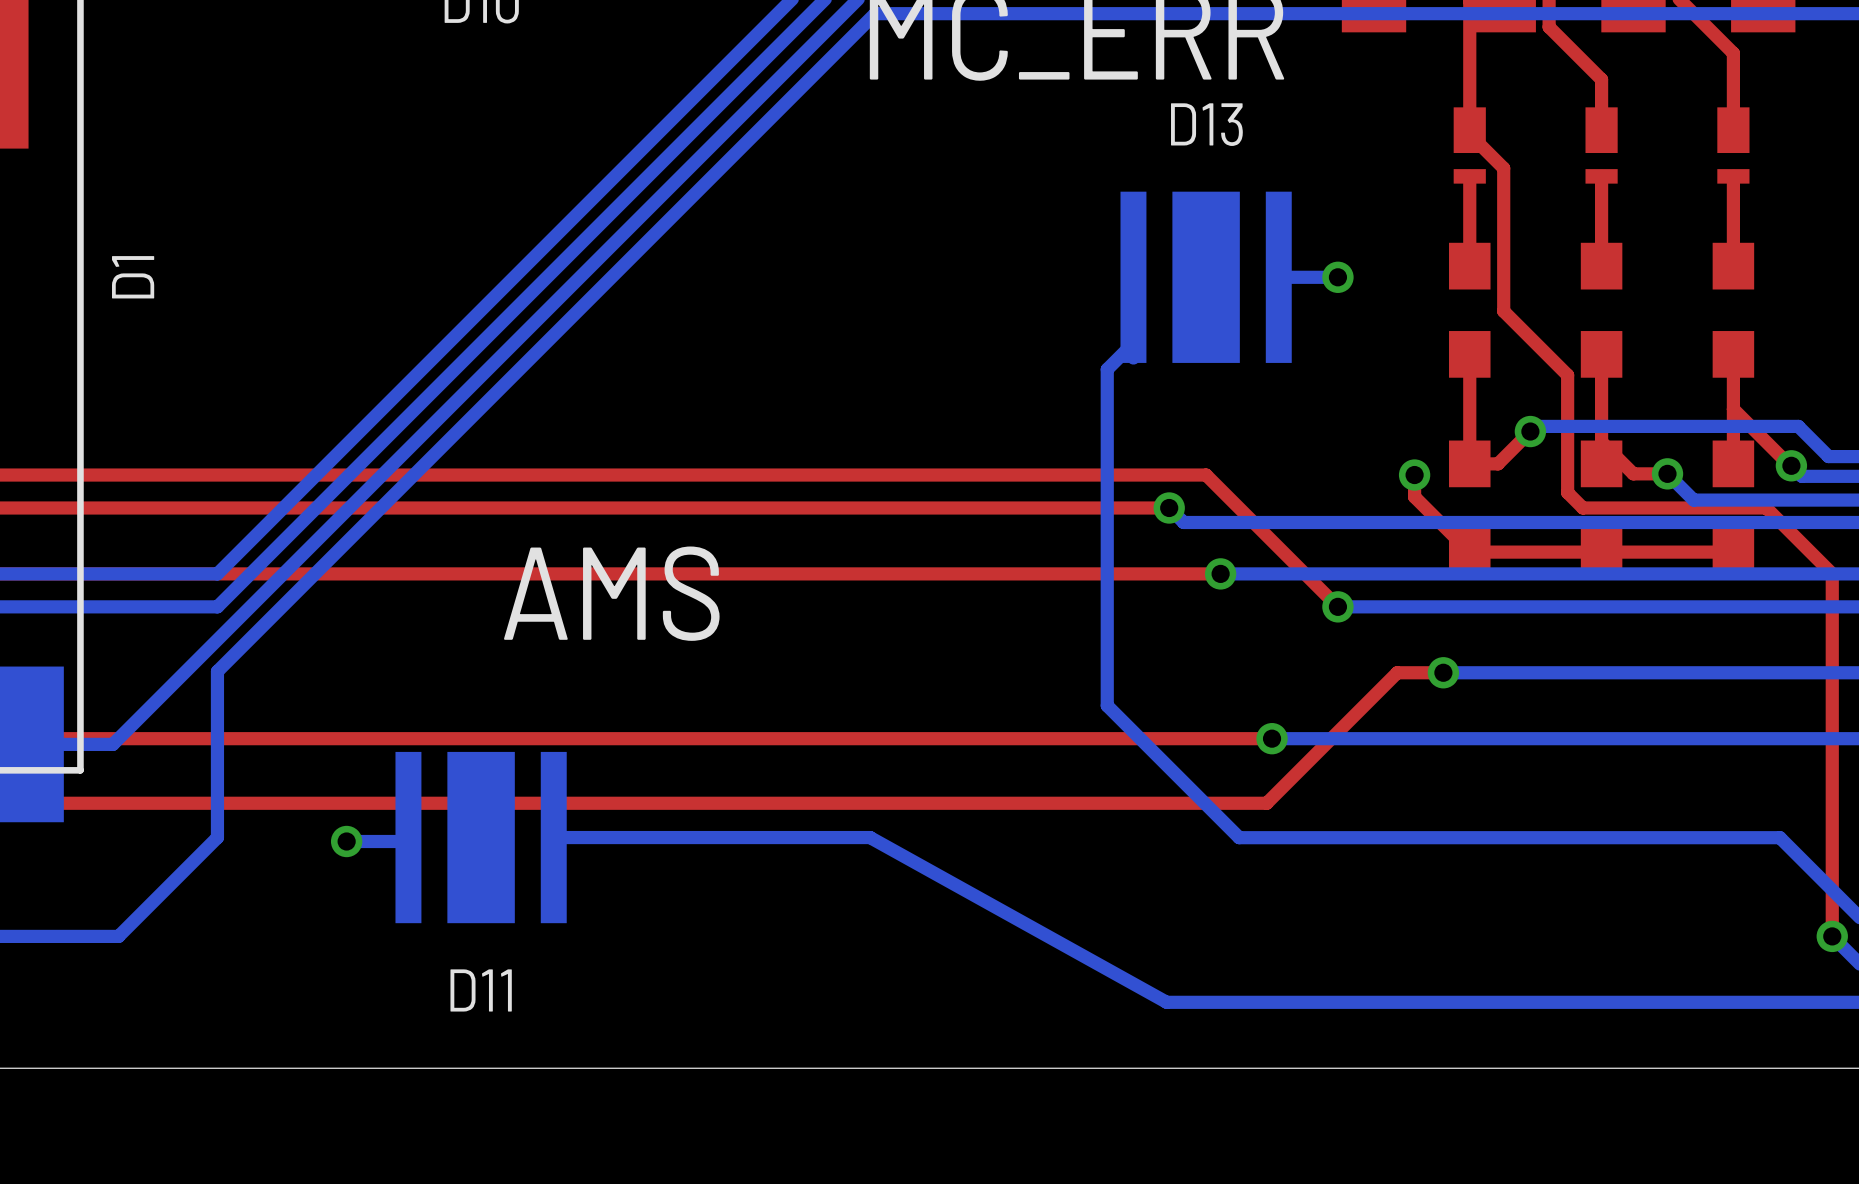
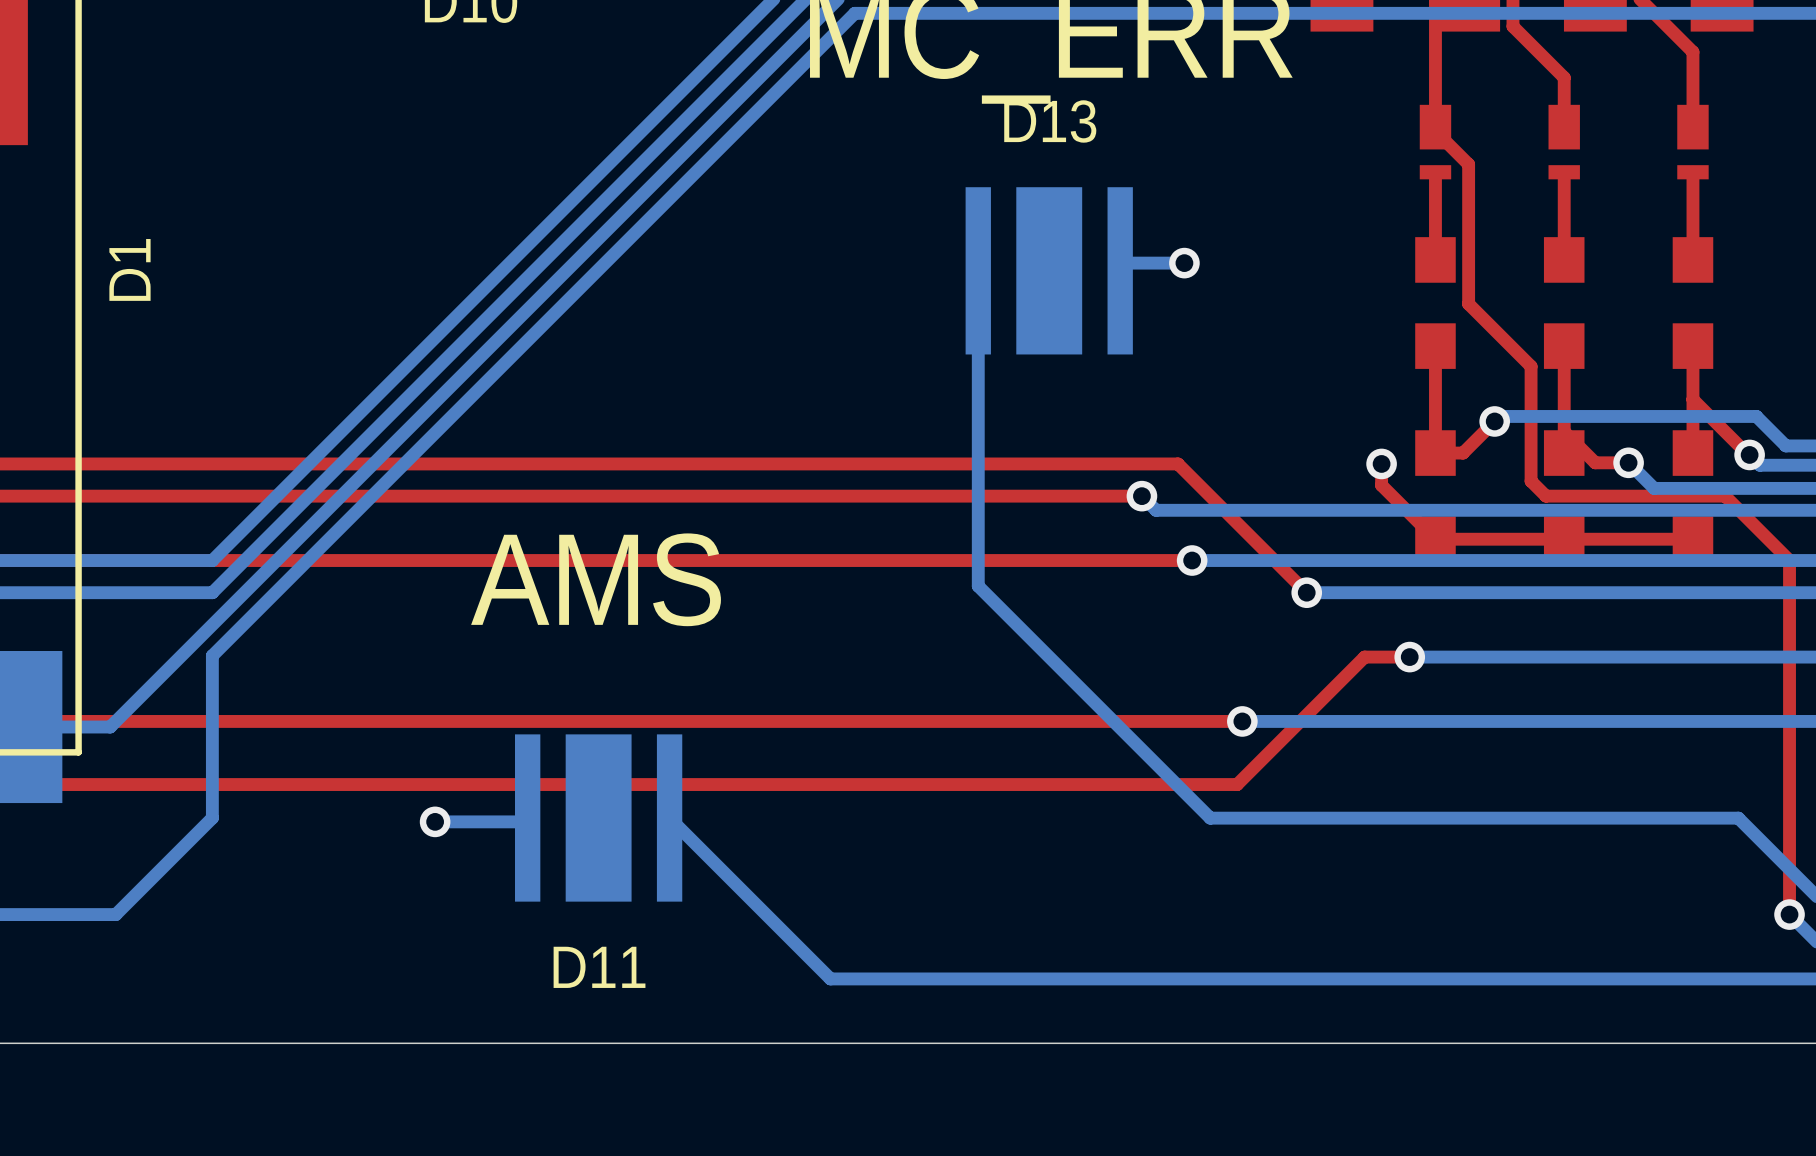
bottom track: none -> (1184, 263) (1127, 263) (1120, 270)
D13 position: (1206, 277) -> (1049, 270)
bottom track: (1337, 277) (1278, 277) -> none
via position: (1337, 277) -> (1184, 263)
bottom track: (1133, 343) (1107, 369) (1107, 705) -> (978, 270) (978, 586) (1081, 689)
bottom track: (408, 837) (404, 841) (346, 841) -> none
D11 position: (481, 837) -> (598, 818)
bottom track: none -> (527, 818) (523, 821) (435, 821)
bottom track: (553, 837) (870, 837) (1166, 1002) -> (669, 818) (830, 978) (1139, 978)
via position: (346, 841) -> (435, 821)

